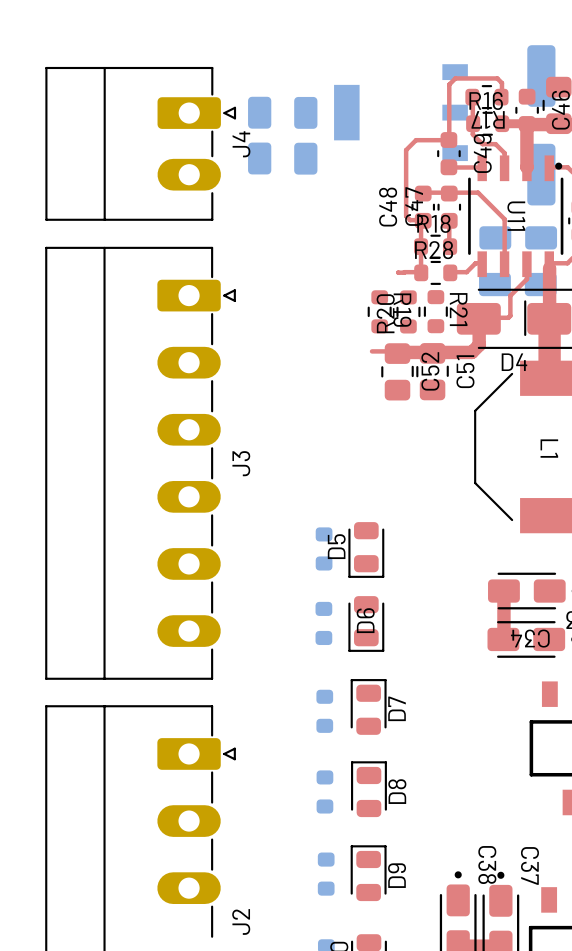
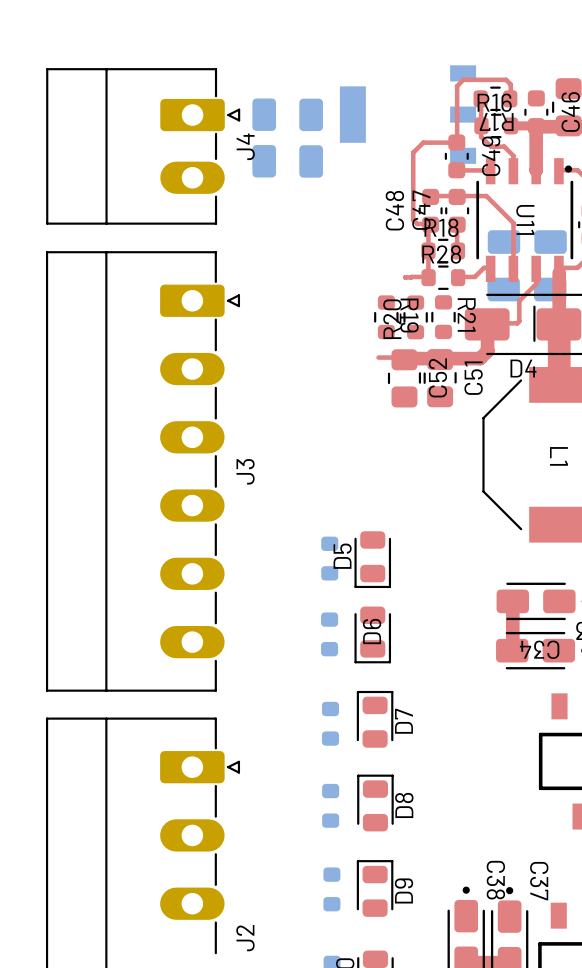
part: (541, 125) -> none

